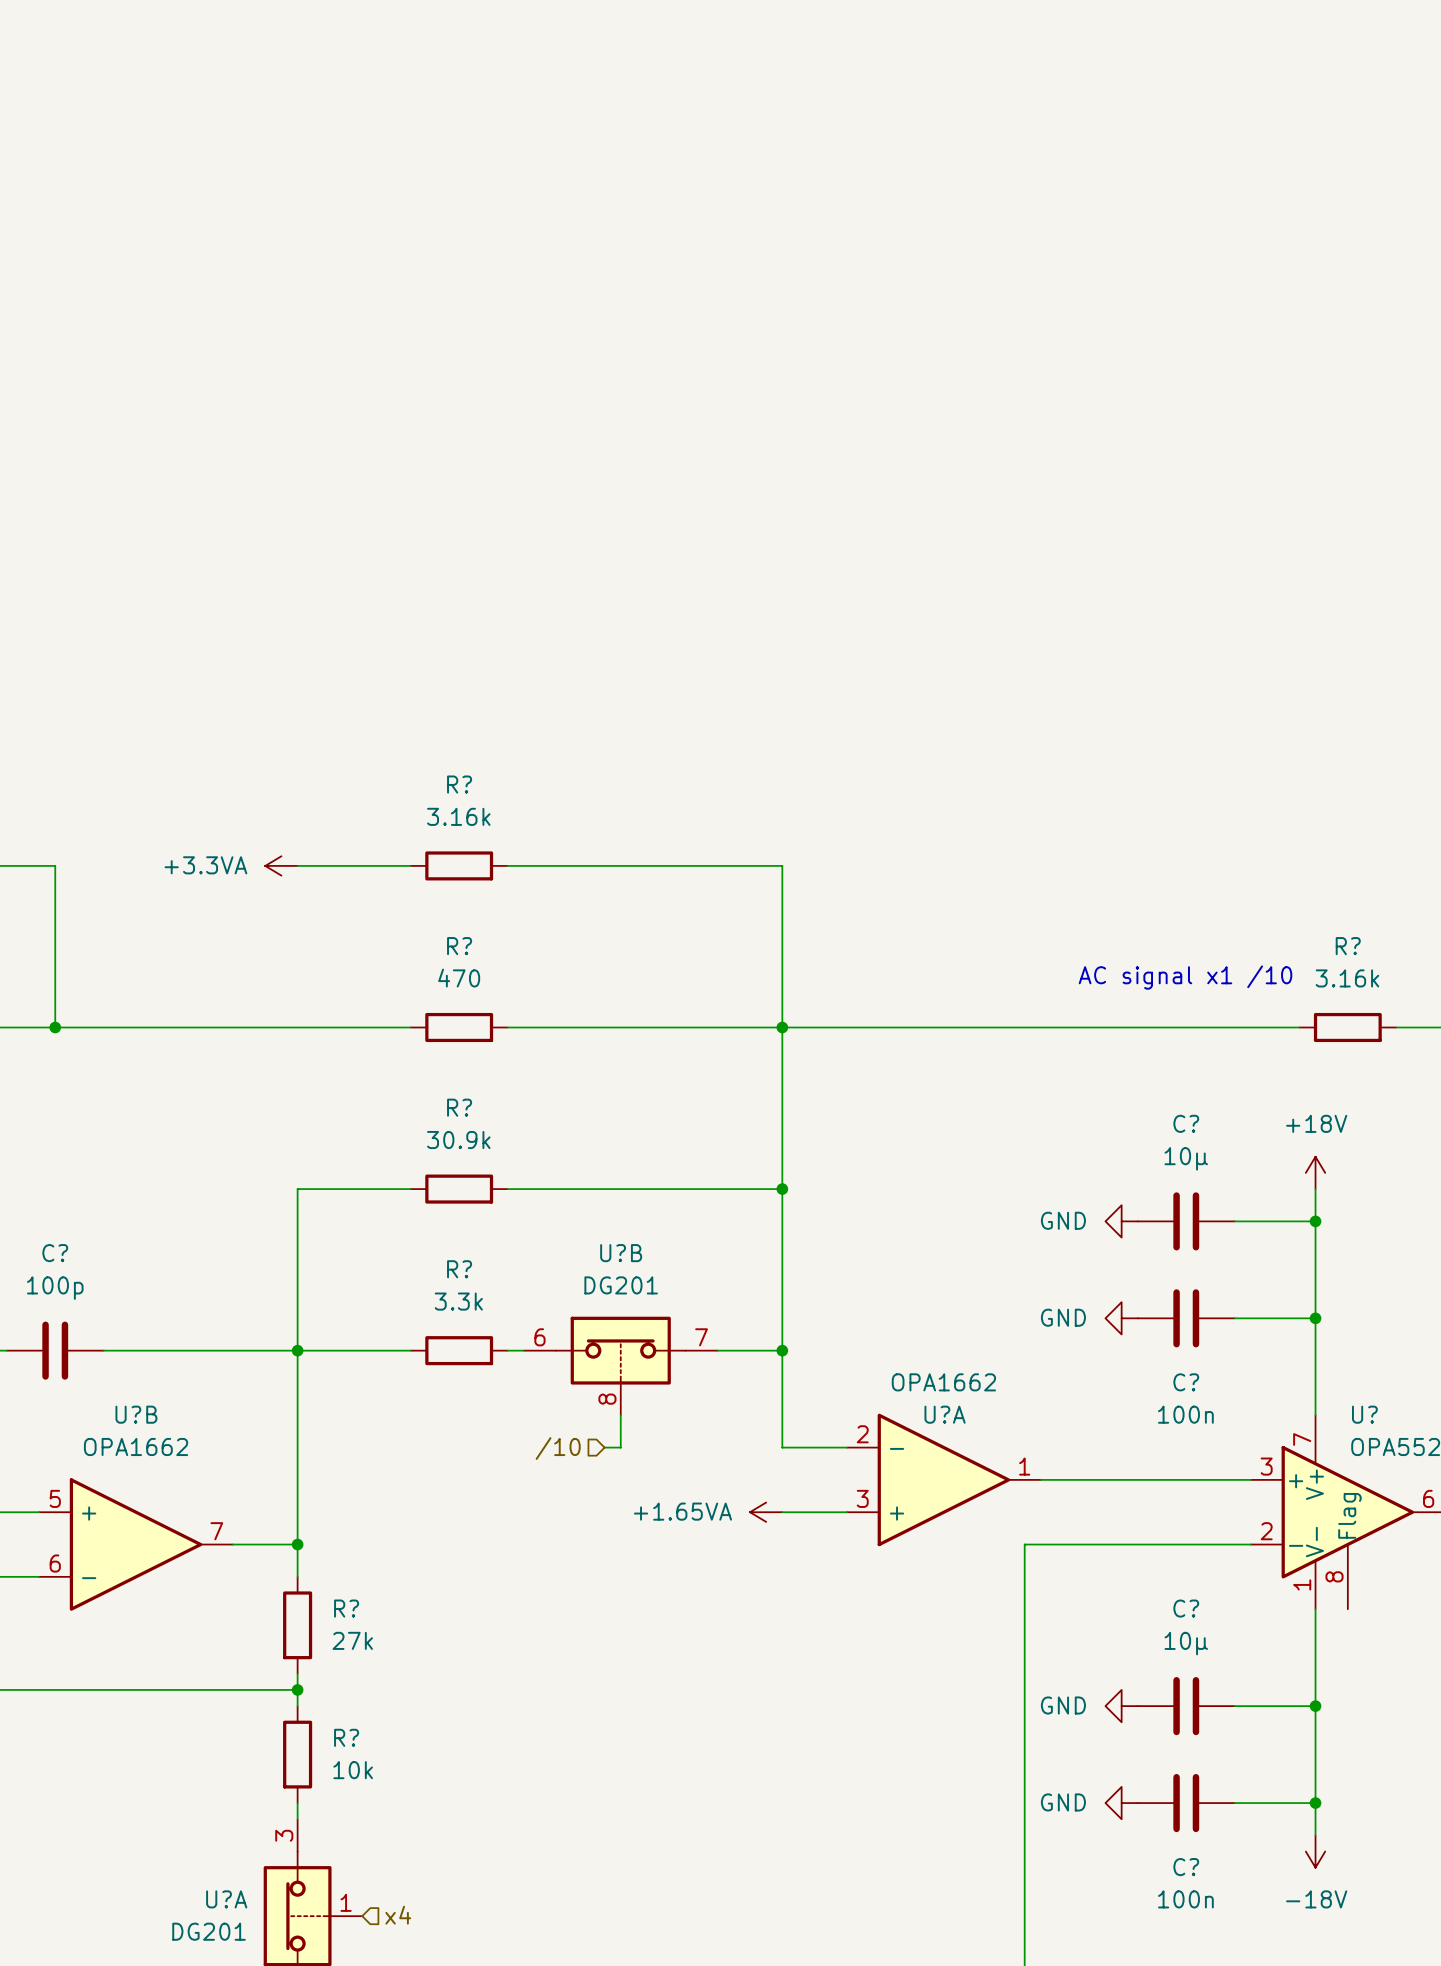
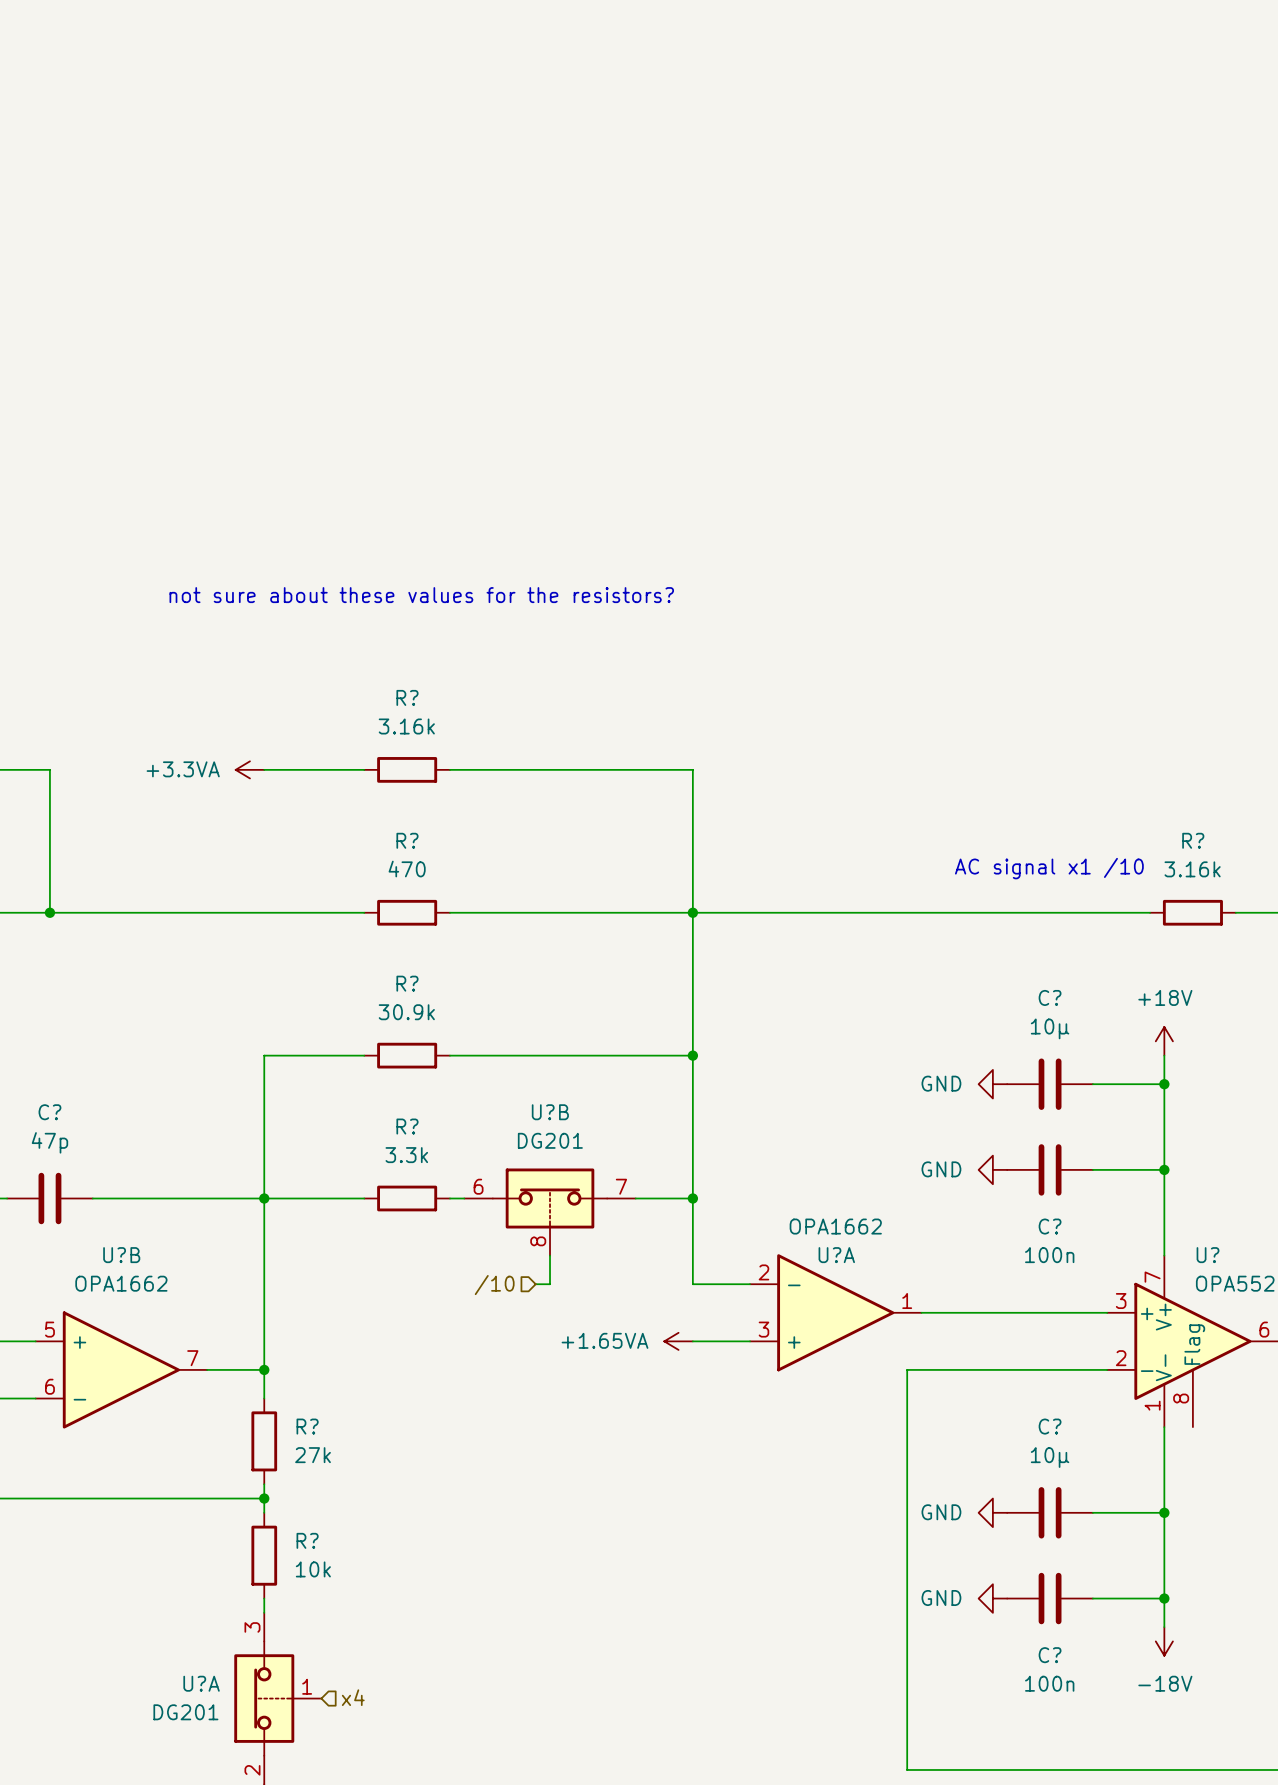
text: none -> not sure about these values for the resistors? (421, 595)
C? value: 100p (55, 1288) -> 47p (49, 1142)

